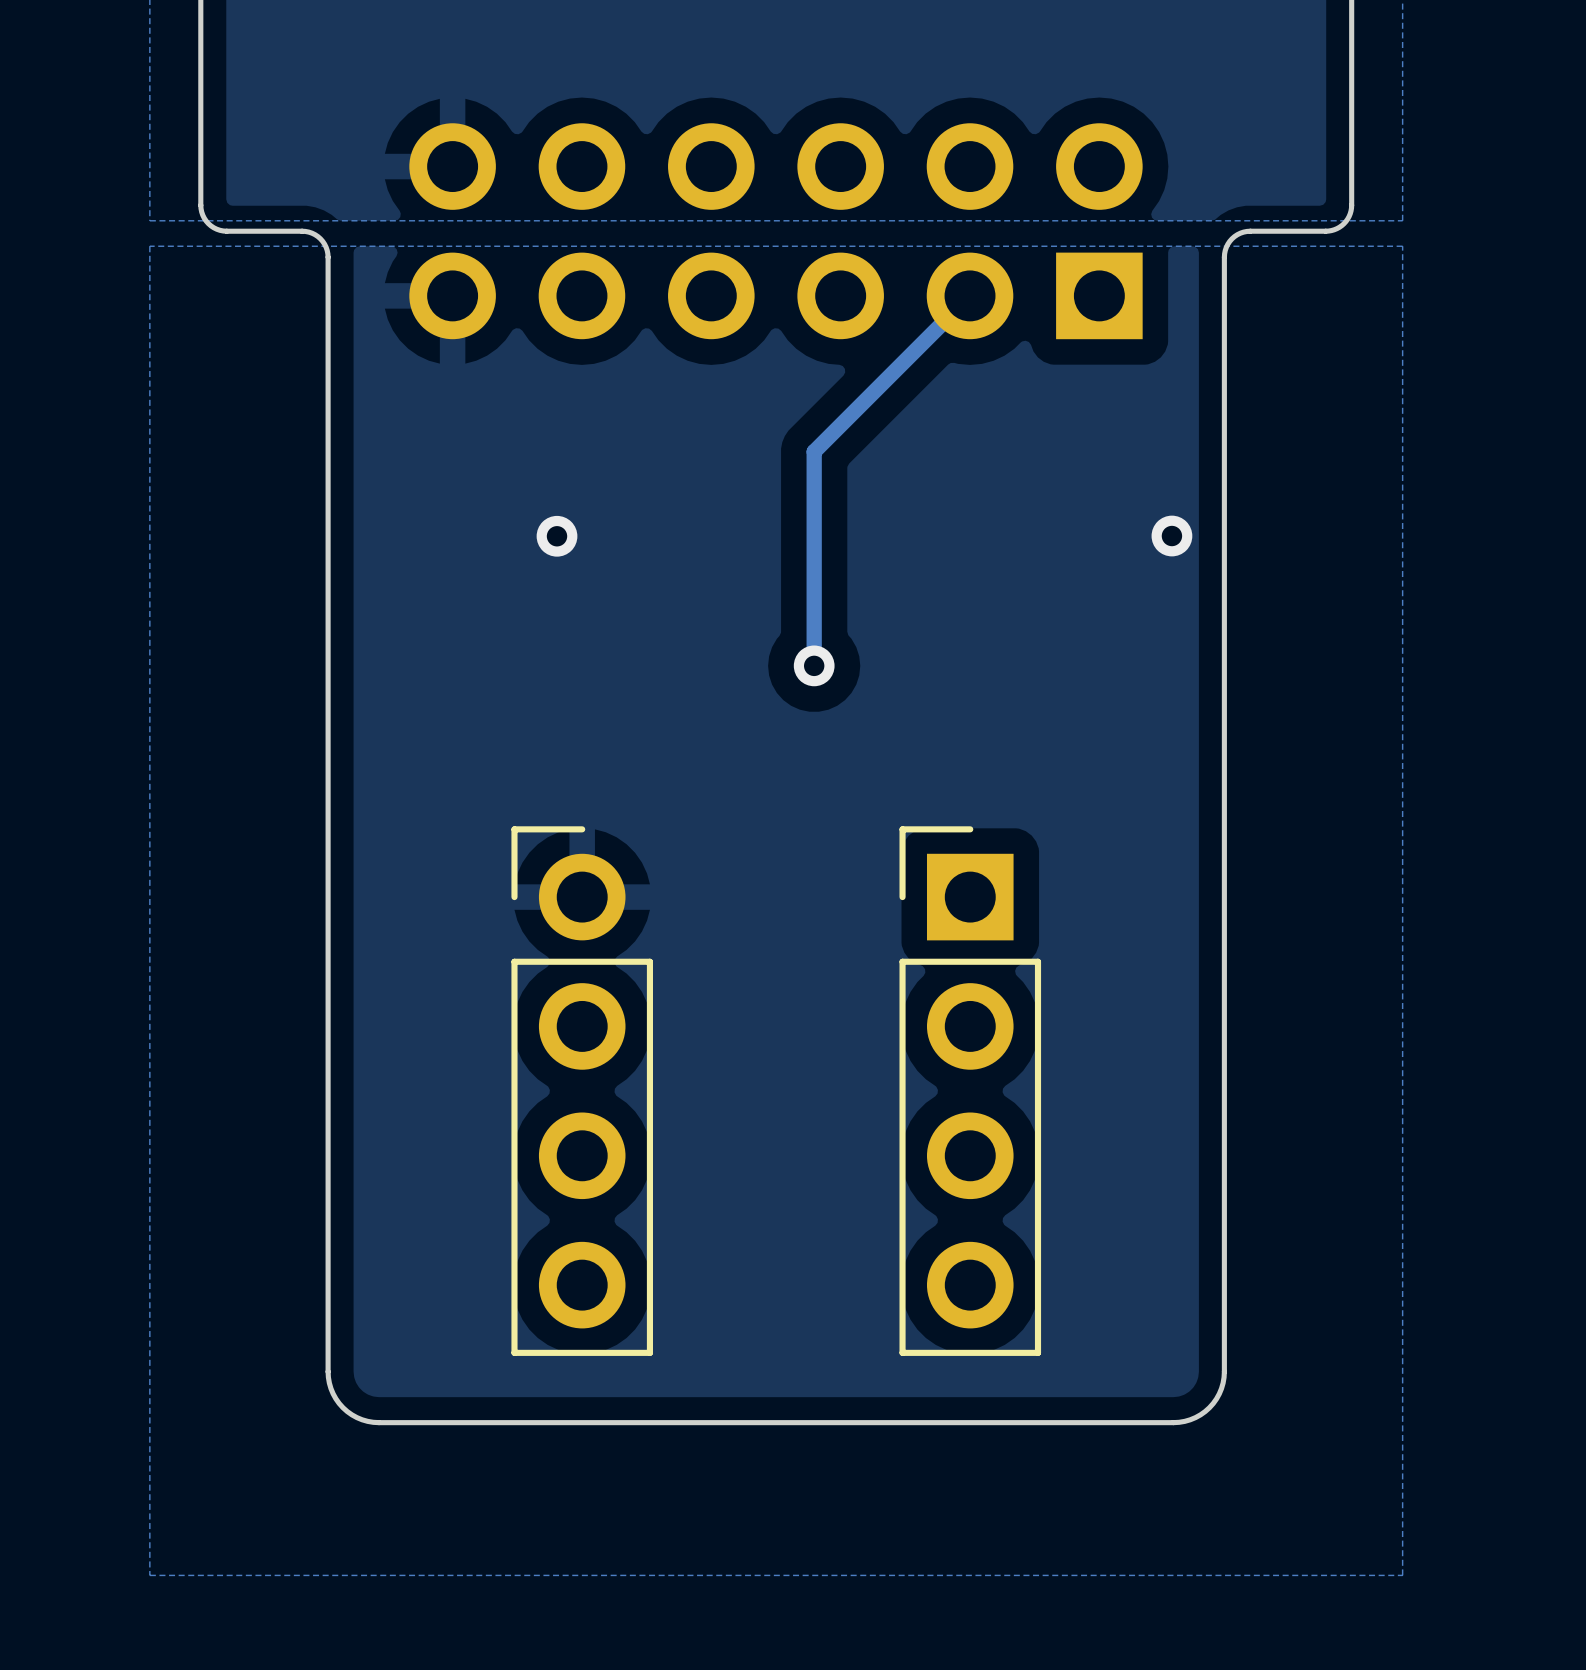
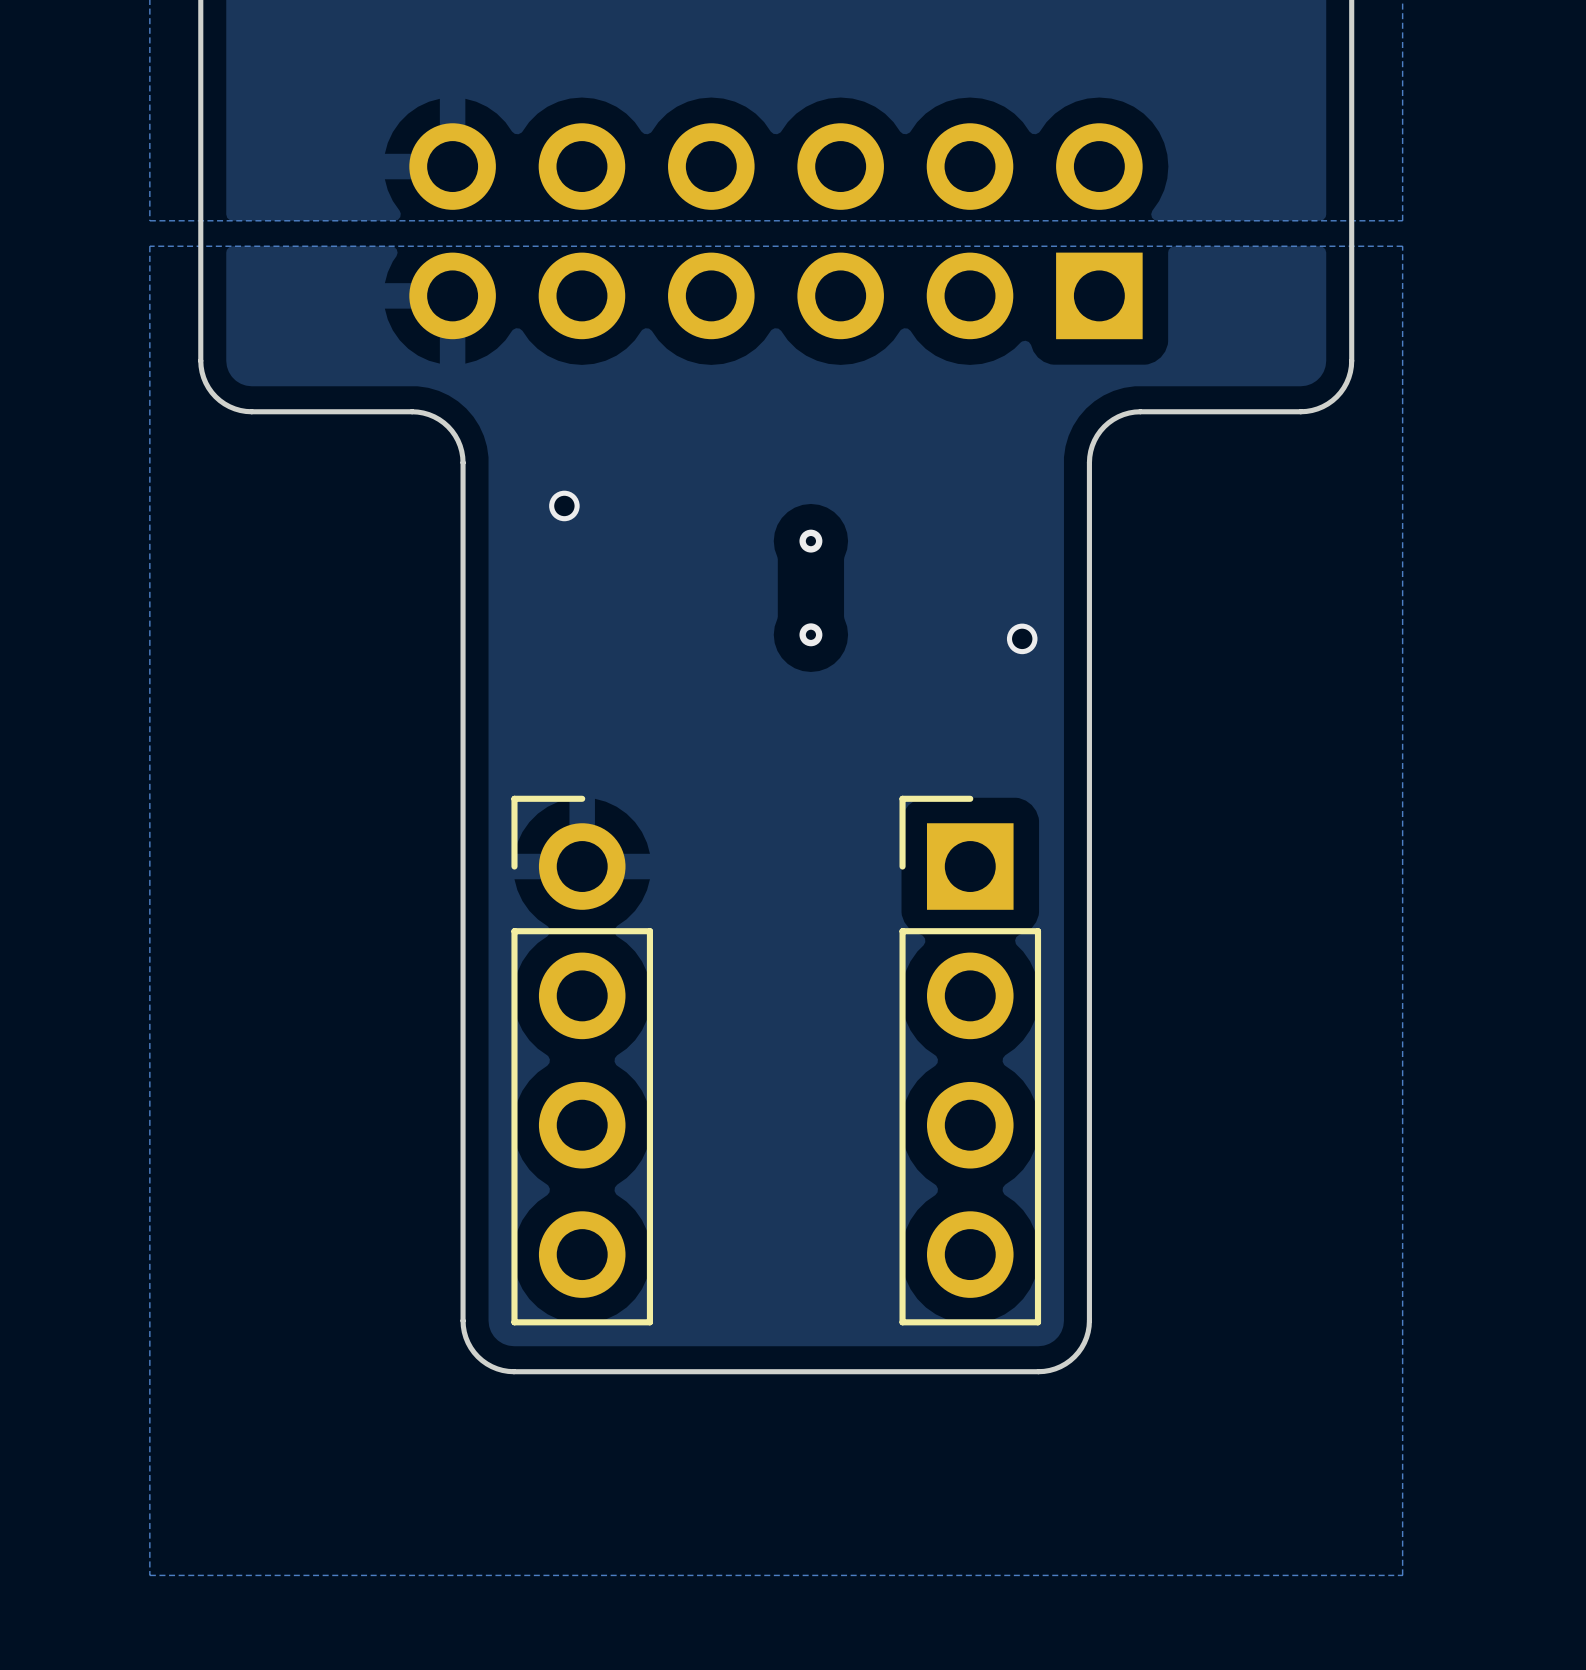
board edge: (1351, 205) (1347, 219) (1334, 229) (1243, 232) (1229, 241) (1224, 253) (1224, 1371) (1221, 1388) (1209, 1407) (1195, 1417) (1173, 1422) (379, 1422) (356, 1417) (339, 1403) (330, 1388) (328, 1371) (327, 253) (320, 238) (308, 232) (226, 231) (216, 229) (206, 221) (200, 205) -> (1351, 205) (1351, 366) (1346, 382) (1336, 396) (1322, 406) (1306, 411) (1129, 413) (1113, 419) (1104, 426) (1097, 435) (1090, 451) (1089, 1326) (1084, 1342) (1074, 1356) (1055, 1368) (1038, 1371) (513, 1371) (491, 1366) (474, 1352) (465, 1337) (463, 1320) (461, 451) (455, 435) (448, 426) (434, 416) (423, 413) (246, 411) (229, 406) (215, 396) (205, 382) (201, 366) (200, 205)
track: (970, 295) (814, 451) (814, 665) -> none
via position: (557, 536) -> (564, 505)
via: (1171, 536) -> none
via: none -> (810, 541)
via: none -> (1022, 638)
via size: [793, 645, 835, 687] -> [799, 623, 823, 647]
part position: (582, 1091) -> (582, 1060)
part position: (970, 1091) -> (970, 1060)

